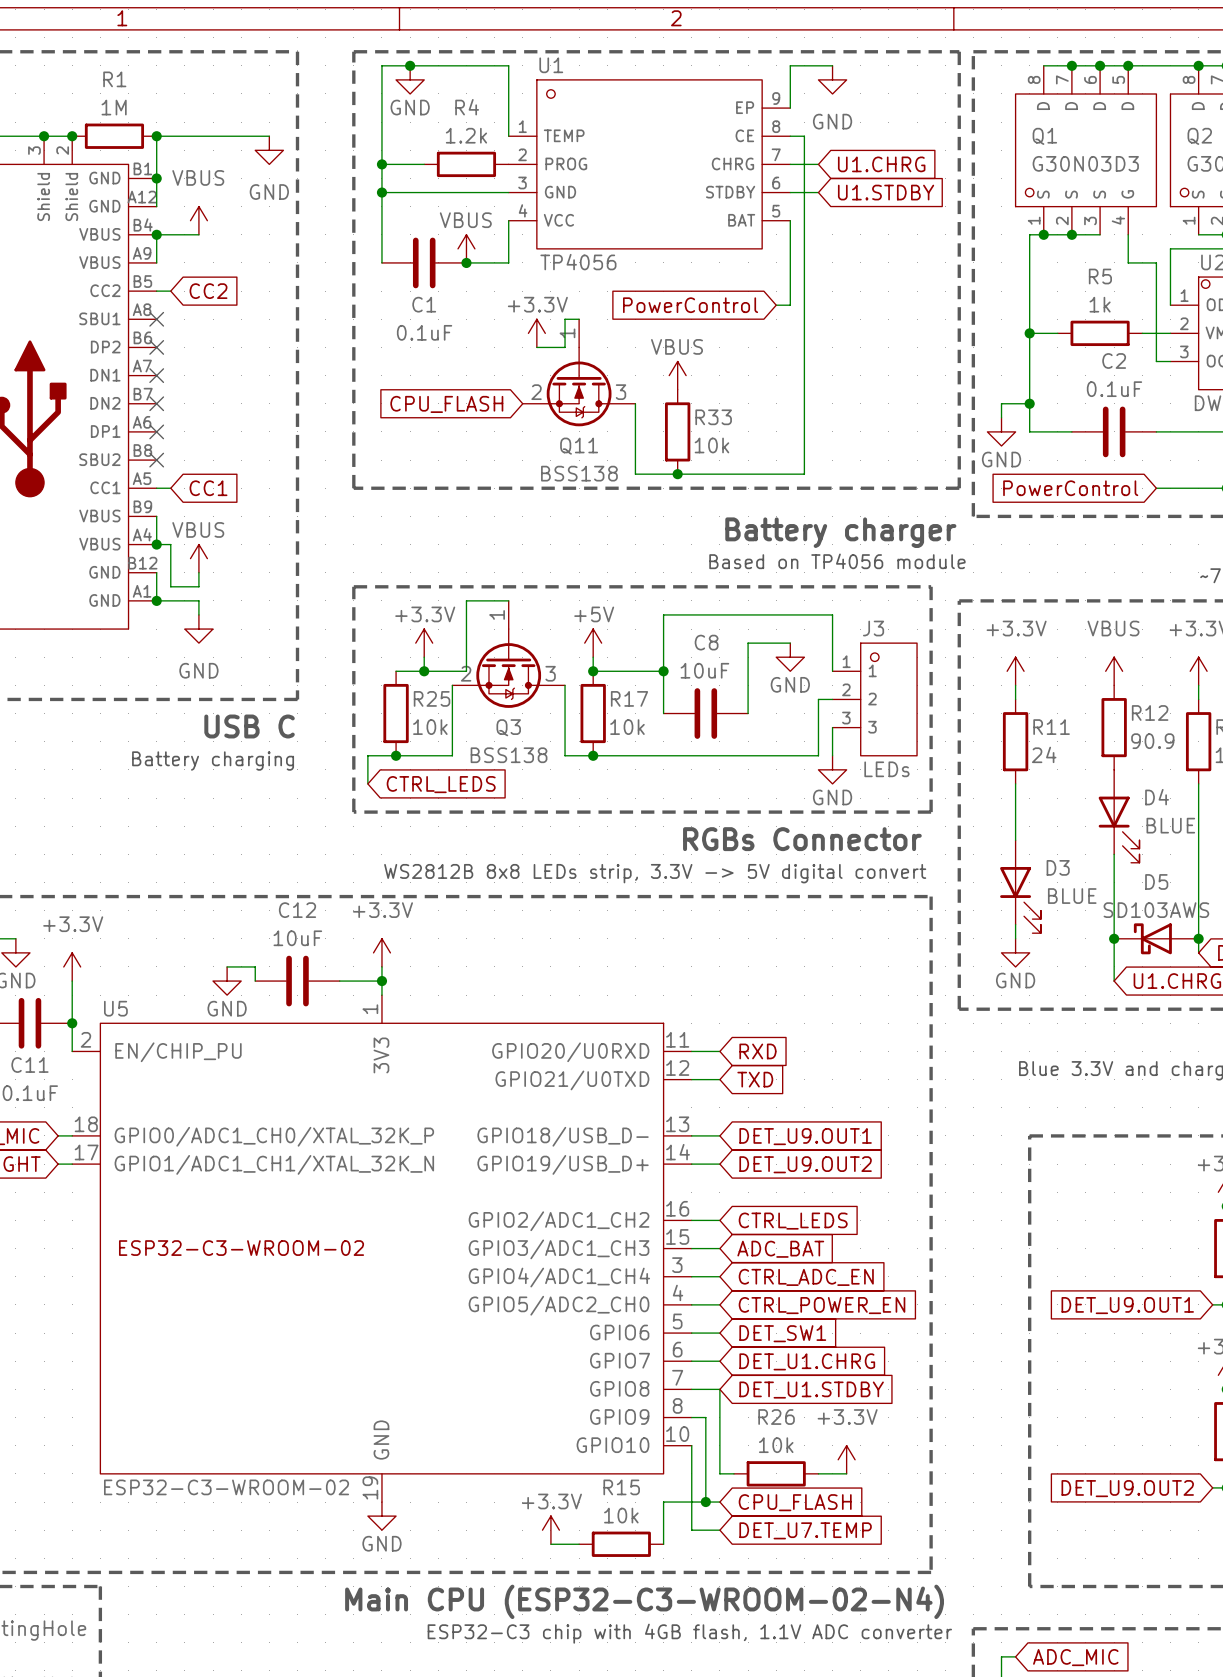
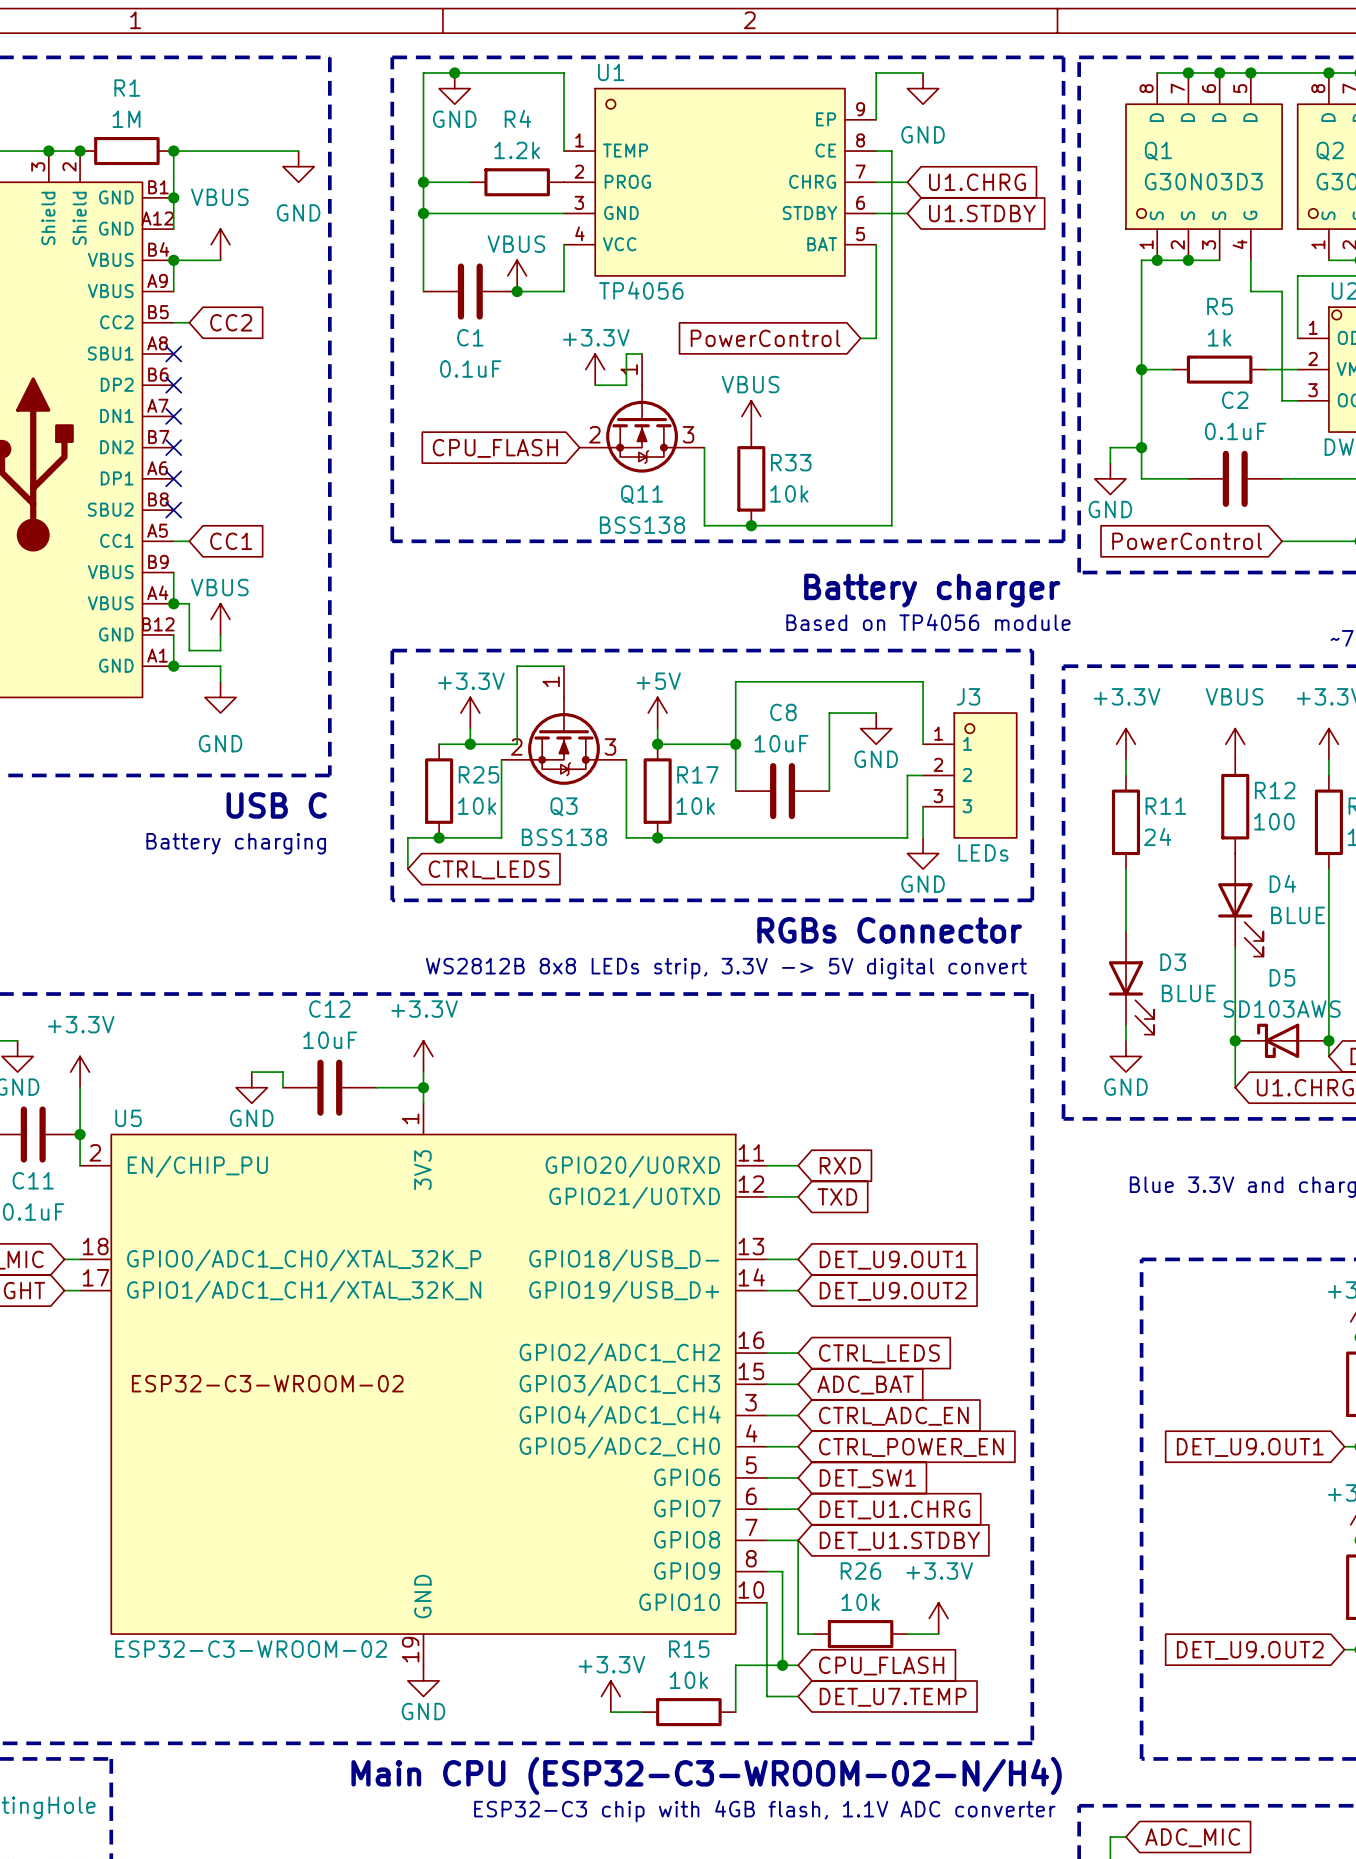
R12 value: 90.9 (1152, 741) -> 100 (1274, 821)
text: Main CPU (ESP32-C3-WROOM-02-N4) (644, 1601) -> Main CPU (ESP32-C3-WROOM-02-N/H4) (706, 1775)

